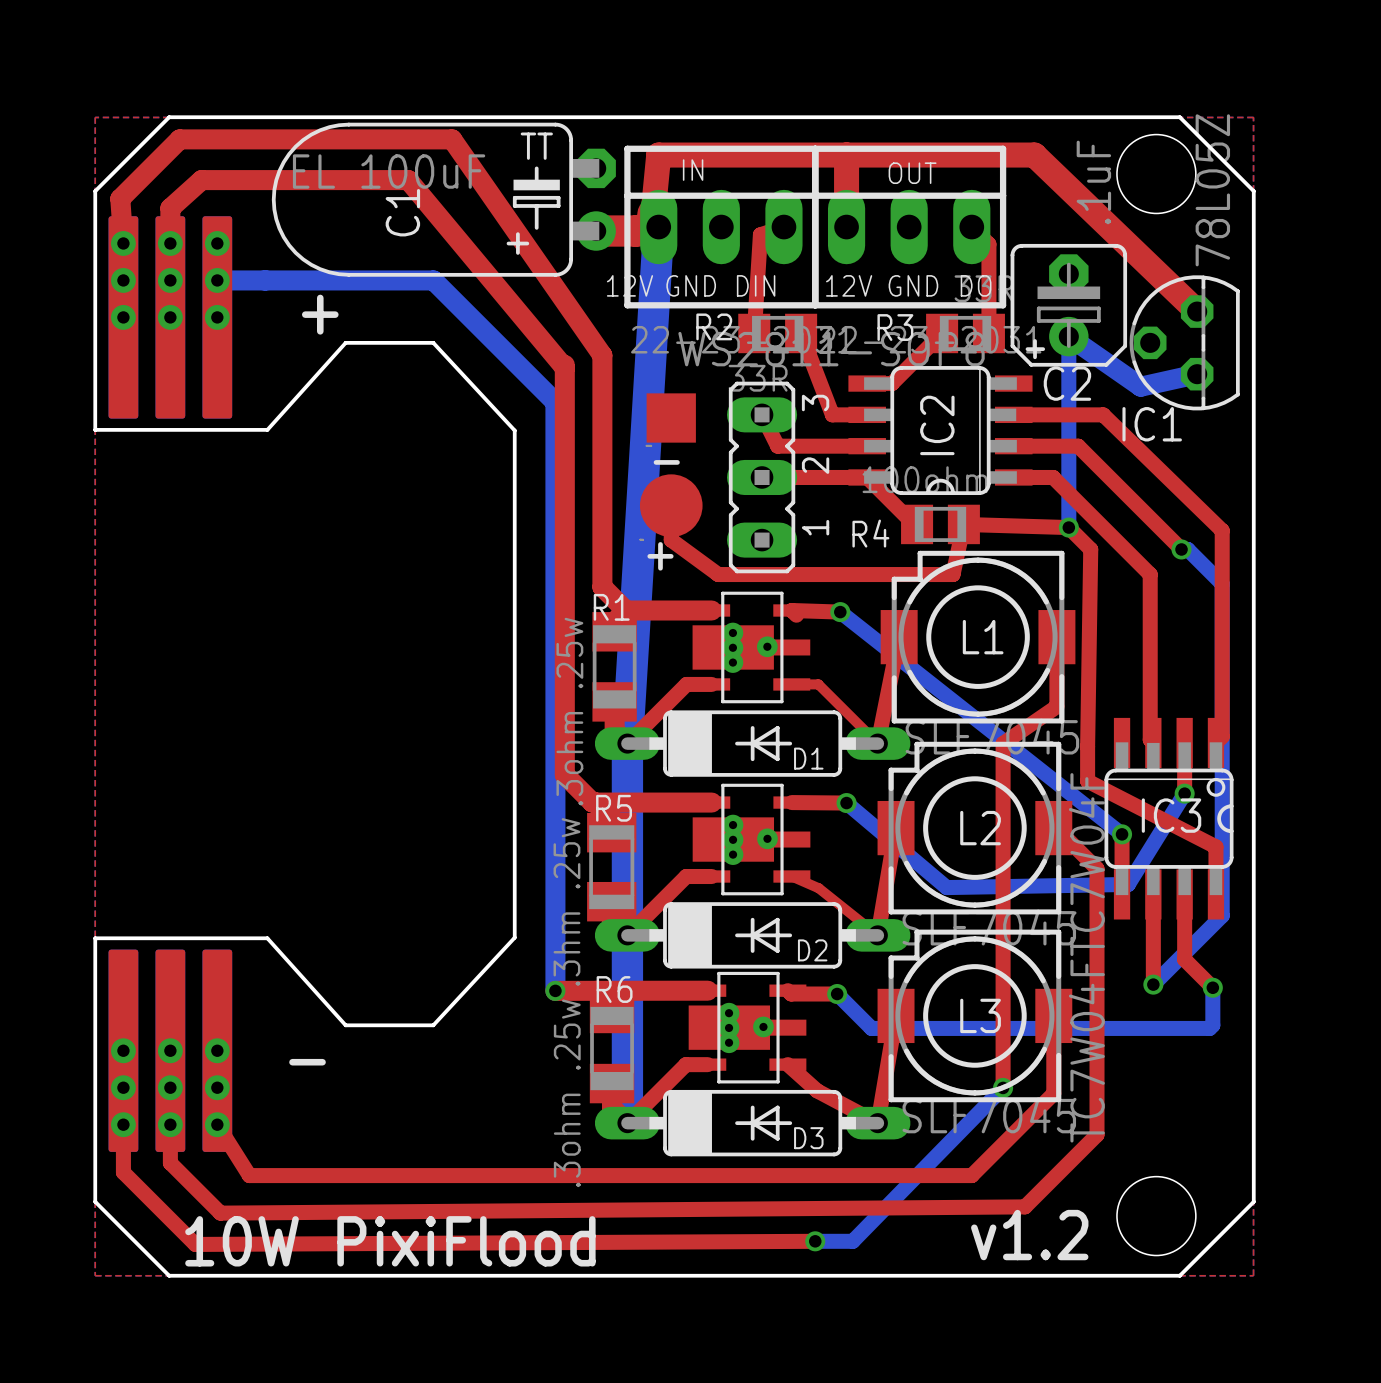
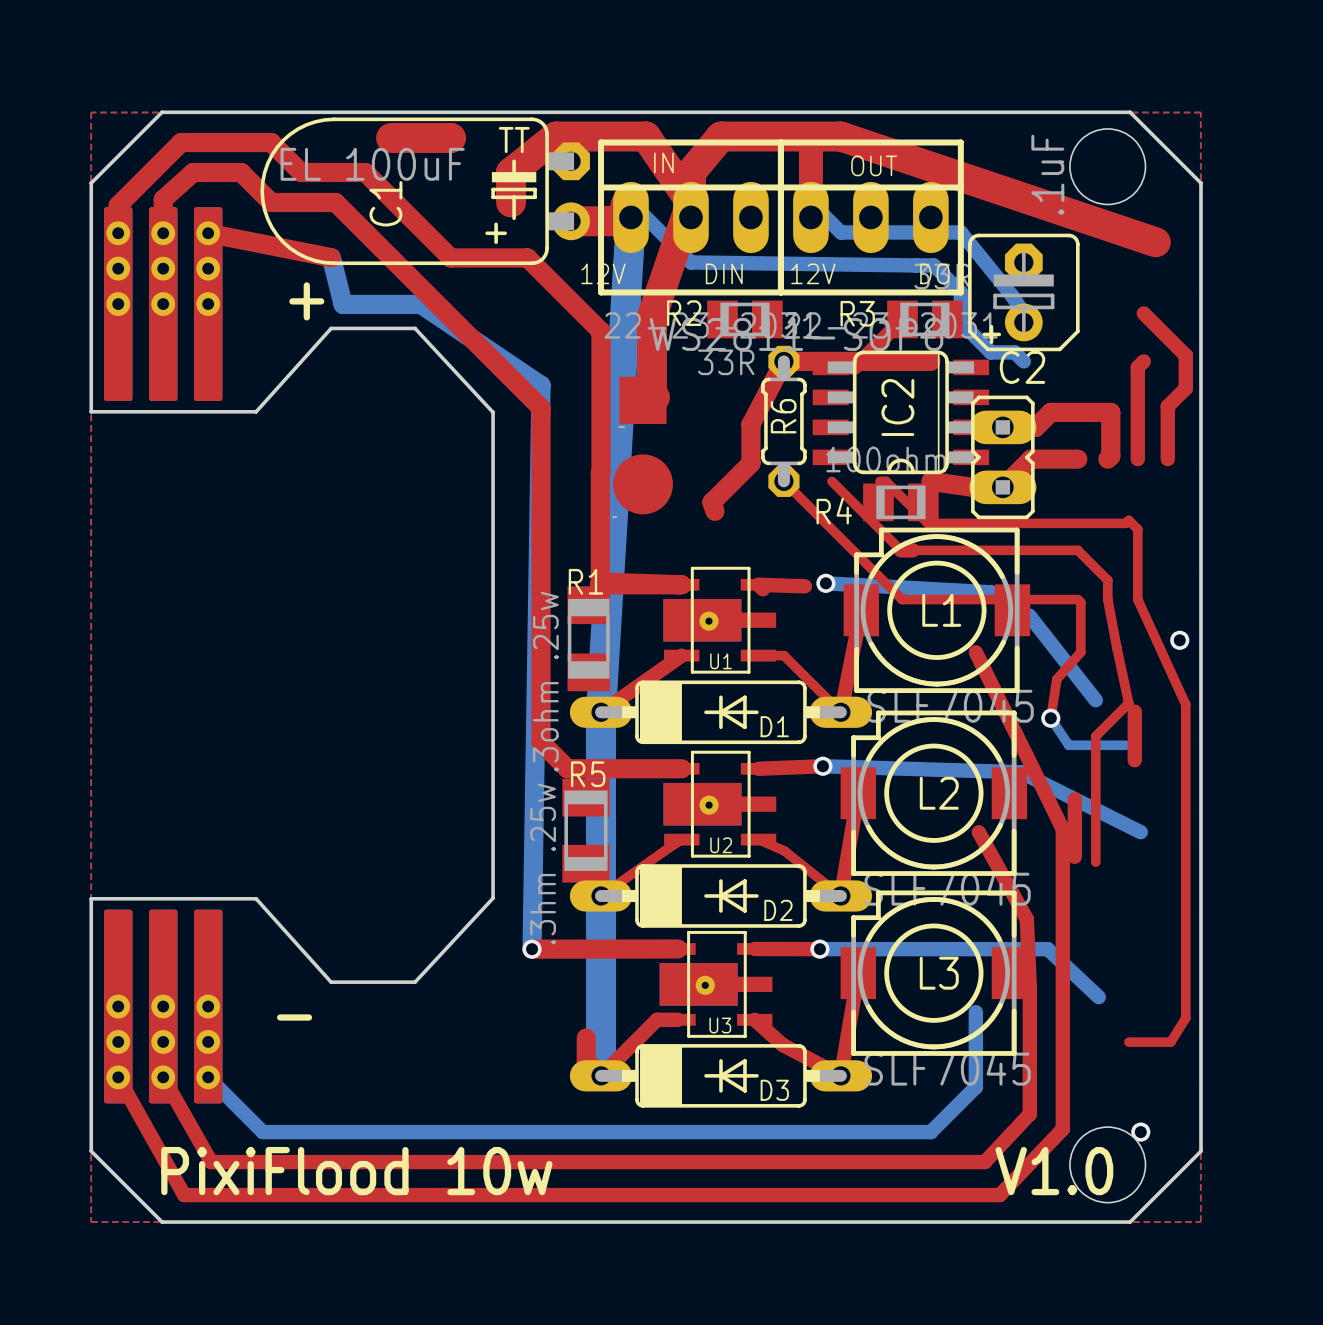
top track: none -> (391, 137) (450, 137)
top track: (251, 180) (314, 180) -> (118, 233) (118, 205) (181, 142) (271, 142) (301, 172)
top track: (381, 180) (408, 180) (564, 367) -> (365, 172) (450, 257) (527, 257) (601, 331) (600, 582) (681, 584)
top track: none -> (511, 202) (511, 172) (556, 136) (646, 136) (690, 202)
bottom track: none -> (631, 202) (690, 262) (933, 265) (960, 292) (960, 322) (990, 352) (1014, 352) (1023, 361)
top track: none -> (690, 202) (690, 172) (720, 136) (840, 136) (1155, 242)
top track: none -> (690, 202) (651, 316) (651, 394) (654, 397)
bottom track: none -> (810, 202) (840, 232) (960, 232) (1011, 295) (1023, 313)
top track: (658, 227) (653, 213) (658, 155) (1034, 155) (1197, 311) -> none
top track: (783, 227) (760, 234) (754, 333) -> none
top track: (971, 227) (988, 244) (988, 333) -> none
top track: (123, 243) (120, 198) (179, 139) (452, 139) (602, 355) (602, 587) (625, 610) (614, 621) (614, 631) -> none
top track: none -> (331, 257) (208, 233) (208, 265)
bottom track: (217, 280) (433, 280) (555, 402) (555, 990) -> (331, 257) (343, 304) (421, 304) (541, 385) (532, 949)
text: GND (691, 285) -> none
text: GND (913, 285) -> none
top track: none -> (1143, 313) (1185, 355) (1185, 388) (1167, 406) (1167, 459)
top track: (801, 333) (832, 414) (867, 414) -> none
IC1: 78L05Z (1184, 342) -> none
top track: (564, 364) (564, 425) -> (241, 172) (271, 202) (335, 202) (541, 407)
bottom track: (1197, 374) (1140, 386) (1068, 336) (1068, 527) -> none
top track: none -> (930, 361) (783, 361) (750, 424) (750, 463) (711, 502) (714, 511)
top track: none -> (1143, 361) (1137, 367) (1137, 459)
top track: (762, 414) (777, 446) (867, 446) -> none
top track: (1013, 414) (1103, 414) (1222, 530) (1222, 736) (1215, 742) -> none
top track: (1078, 446) (1181, 549) -> (1032, 427) (1035, 427) (1050, 412) (1110, 412) (1110, 456) (1107, 459)
text: - (666, 462) -> none
top track: (762, 477) (867, 477) (914, 524) (917, 524) -> none
part: (762, 477) -> none
top track: (1013, 477) (1053, 477) (1150, 574) (1150, 739) (1153, 742) -> none
part: none -> (1002, 457)
top track: none -> (1077, 459) (1031, 459) (1002, 487) (972, 487) (930, 481)
top track: none -> (783, 481) (902, 599) (1077, 599) (1080, 602) (1080, 652) (1056, 679) (1050, 718)
top track: none -> (879, 481) (885, 481) (927, 523) (1125, 523) (1128, 520) (1137, 529) (1137, 599) (1185, 704) (1185, 1018) (1170, 1042) (1128, 1042)
top track: (671, 505) (671, 540) (718, 574) (940, 574) -> (831, 481) (900, 550)
via: (1068, 527) -> none
bottom track: (1181, 549) (1187, 549) (1222, 583) (1222, 915) (1153, 984) -> none
via: (1181, 549) -> none
text: + (660, 556) -> none
top track: (953, 574) (963, 524) (1068, 527) (1090, 549) (1087, 781) (1215, 846) (1215, 894) -> (912, 550) (1077, 550) (1107, 580) (1107, 599) (1128, 703) (1095, 736) (1095, 862)
bottom track: none -> (825, 583) (990, 592) (1029, 616) (1095, 700)
bottom track: (840, 612) (1122, 834) -> none
via position: (840, 612) -> (825, 583)
top track: (1056, 637) (1056, 706) (1003, 743) (1003, 1087) -> none
part: (751, 647) -> none
U1: none -> (719, 620)
via: none -> (1179, 640)
top track: (711, 684) (686, 684) (627, 743) (614, 730) (614, 701) -> (681, 655) (601, 712)
bottom track: none -> (1050, 718) (1068, 745) (1125, 745)
via: none -> (1050, 718)
bottom track: (1184, 793) (1128, 884) (946, 887) (846, 803) -> none
via: (1184, 793) -> none
bottom track: none -> (822, 766) (1020, 772) (1140, 832)
top track: (791, 802) (846, 803) -> (758, 768) (822, 766)
via position: (846, 803) -> (822, 766)
IC3: TC7W04FTC7W04F (1169, 818) -> none
top track: (1053, 828) (1056, 828) (1097, 868) (1097, 1134) (1025, 1206) (220, 1213) (170, 1163) (170, 1124) -> (978, 832) (1026, 919) (1029, 988) (1029, 1114) (984, 1162) (211, 1162) (163, 1077)
via: (1122, 834) -> none
part: (751, 839) -> none
U2: none -> (719, 804)
top track: (711, 876) (686, 876) (627, 935) (611, 919) (611, 901) -> (681, 839) (601, 895)
top track: (1153, 894) (1153, 984) -> none
top track: (1184, 894) (1184, 959) (1212, 987) -> none
via: (1153, 984) -> none
bottom track: (1212, 987) (1212, 1025) (1209, 1028) (871, 1028) (837, 994) -> none
via: (1212, 987) -> none
top track: (787, 990) (791, 994) (837, 994) -> (754, 948) (819, 949)
bottom track: none -> (819, 949) (1047, 949) (1098, 997)
R6 footprint: [589, 993, 635, 1104] -> [761, 345, 807, 497]
via position: (837, 994) -> (819, 949)
top track: (1053, 1015) (1053, 1093) (971, 1175) (249, 1175) (217, 1124) (217, 1050) -> none
part: (747, 1027) -> none
U3: none -> (716, 984)
bottom track: none -> (975, 1012) (975, 1087) (930, 1132) (262, 1132) (208, 1077)
bottom track: (1003, 1087) (852, 1241) (815, 1241) -> none
via: (1003, 1087) -> none
R6 value: .3ohm .25w (567, 1093) -> none
top track: (123, 1124) (123, 1172) (195, 1244) (815, 1241) -> (118, 1077) (184, 1195) (999, 1195) (1062, 1129) (1062, 829) (975, 652)
via: none -> (1140, 1132)
text: none -> V1.0 (1054, 1171)
text: v1.2 (1029, 1235) -> none
text: 10W PixiFlood (390, 1241) -> PixiFlood 10w (356, 1171)
via: (815, 1241) -> none

